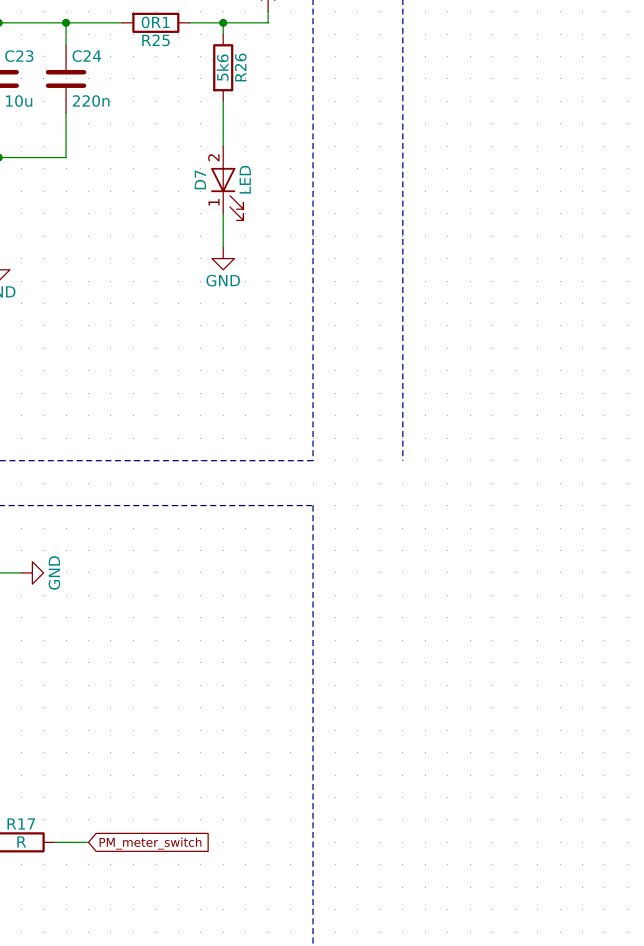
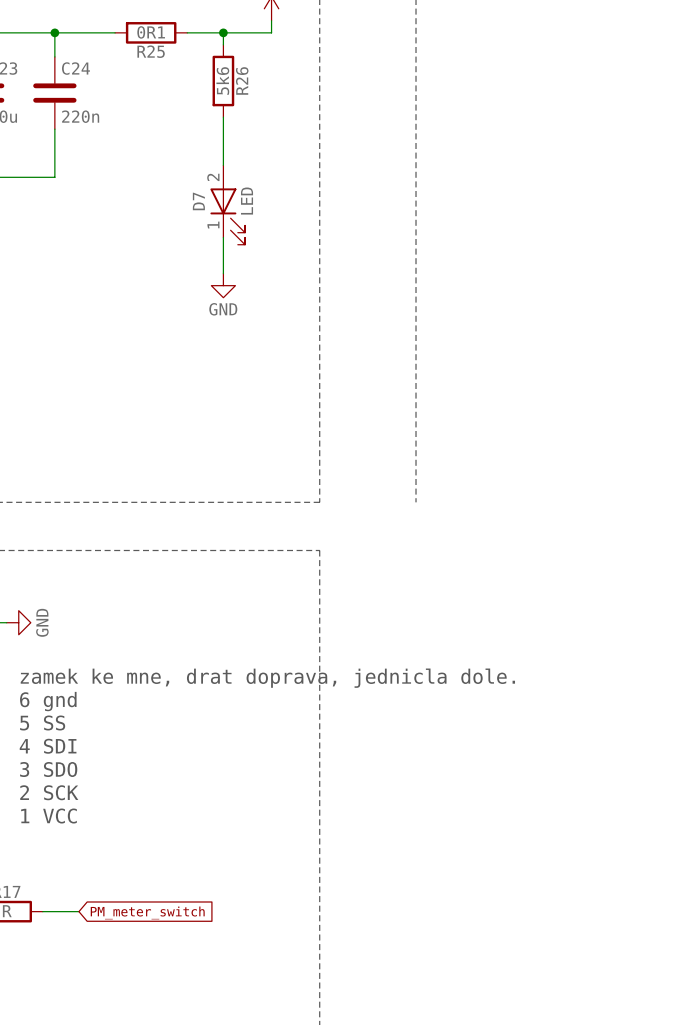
text: none -> zamek ke mne, drat doprava, jednicla dole. (267, 678)
text: none -> 6 gnd (48, 701)
text: none -> 5 SS (42, 722)
text: none -> 4 SDI (48, 746)
text: none -> 3 SDO (48, 769)
text: none -> 2 SCK (49, 792)
text: none -> 1 VCC (48, 816)

